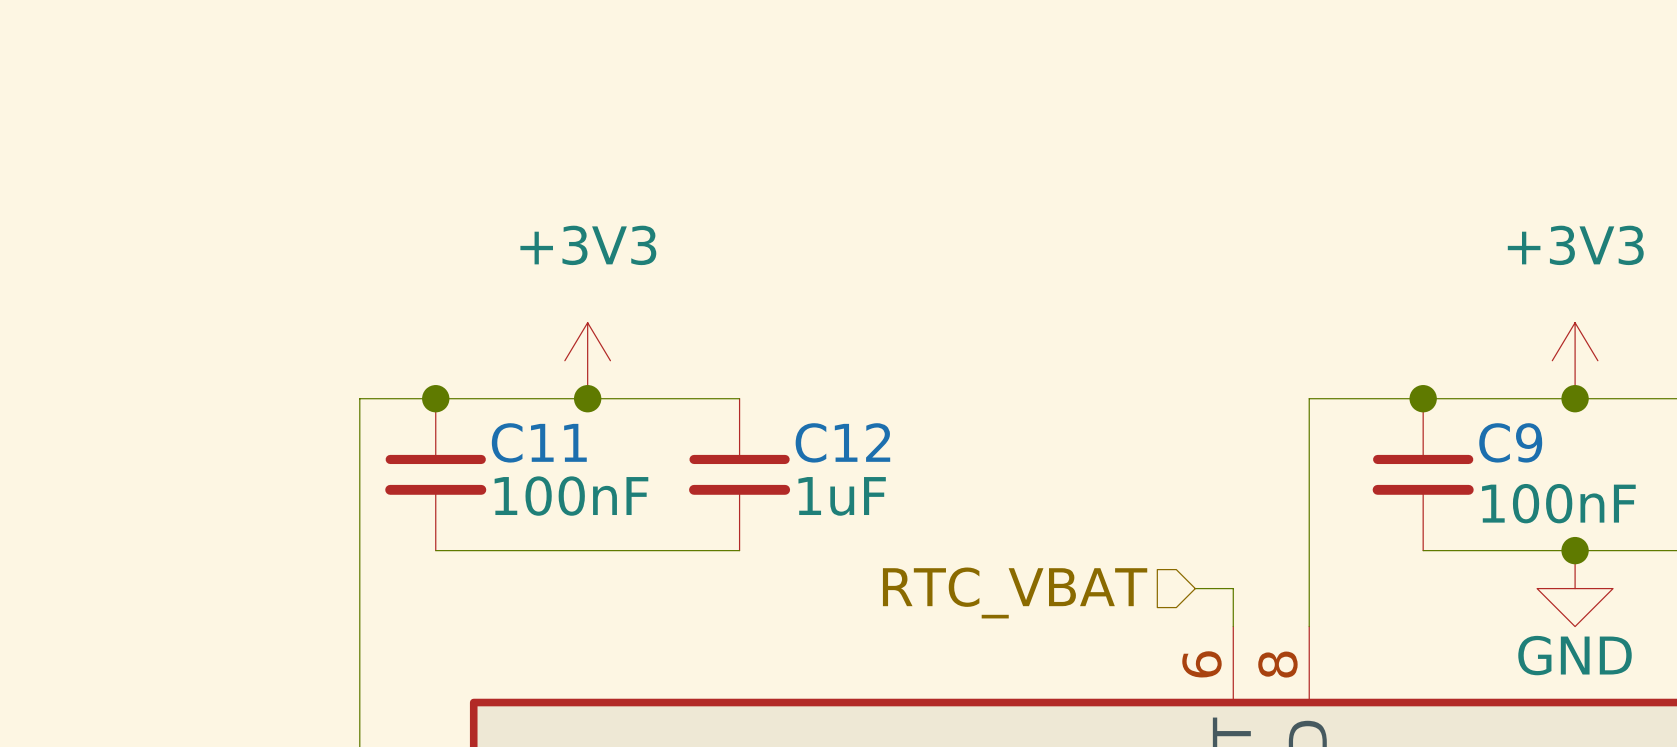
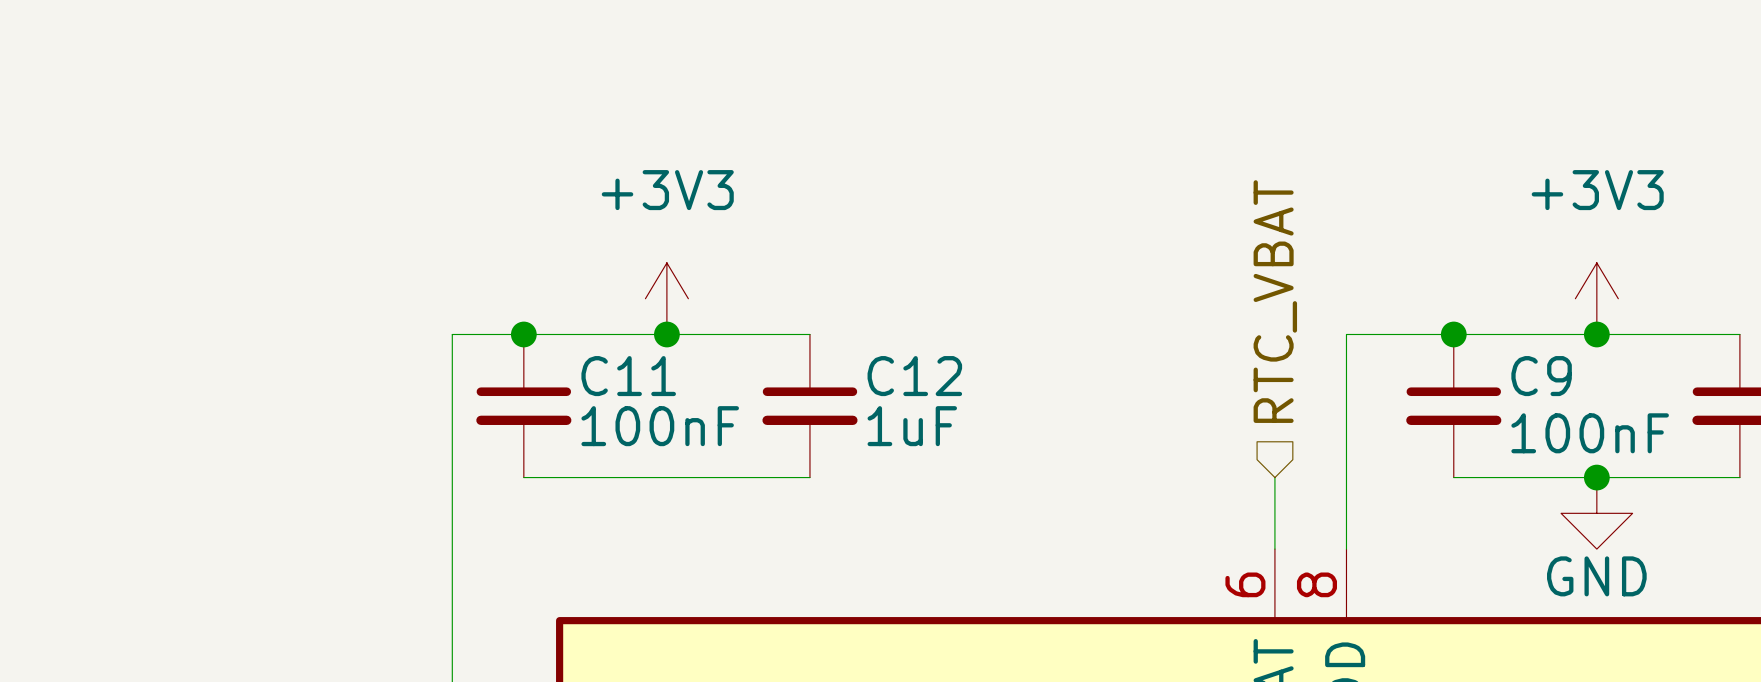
wire: (1195, 588) (1233, 588) -> (1274, 477) (1274, 513)
hierarchical label rotation: 0° (1015, 592) -> 90° clockwise (1275, 301)
hierarchical label position: RTC_VBAT (1015, 592) -> RTC_VBAT (1275, 301)

